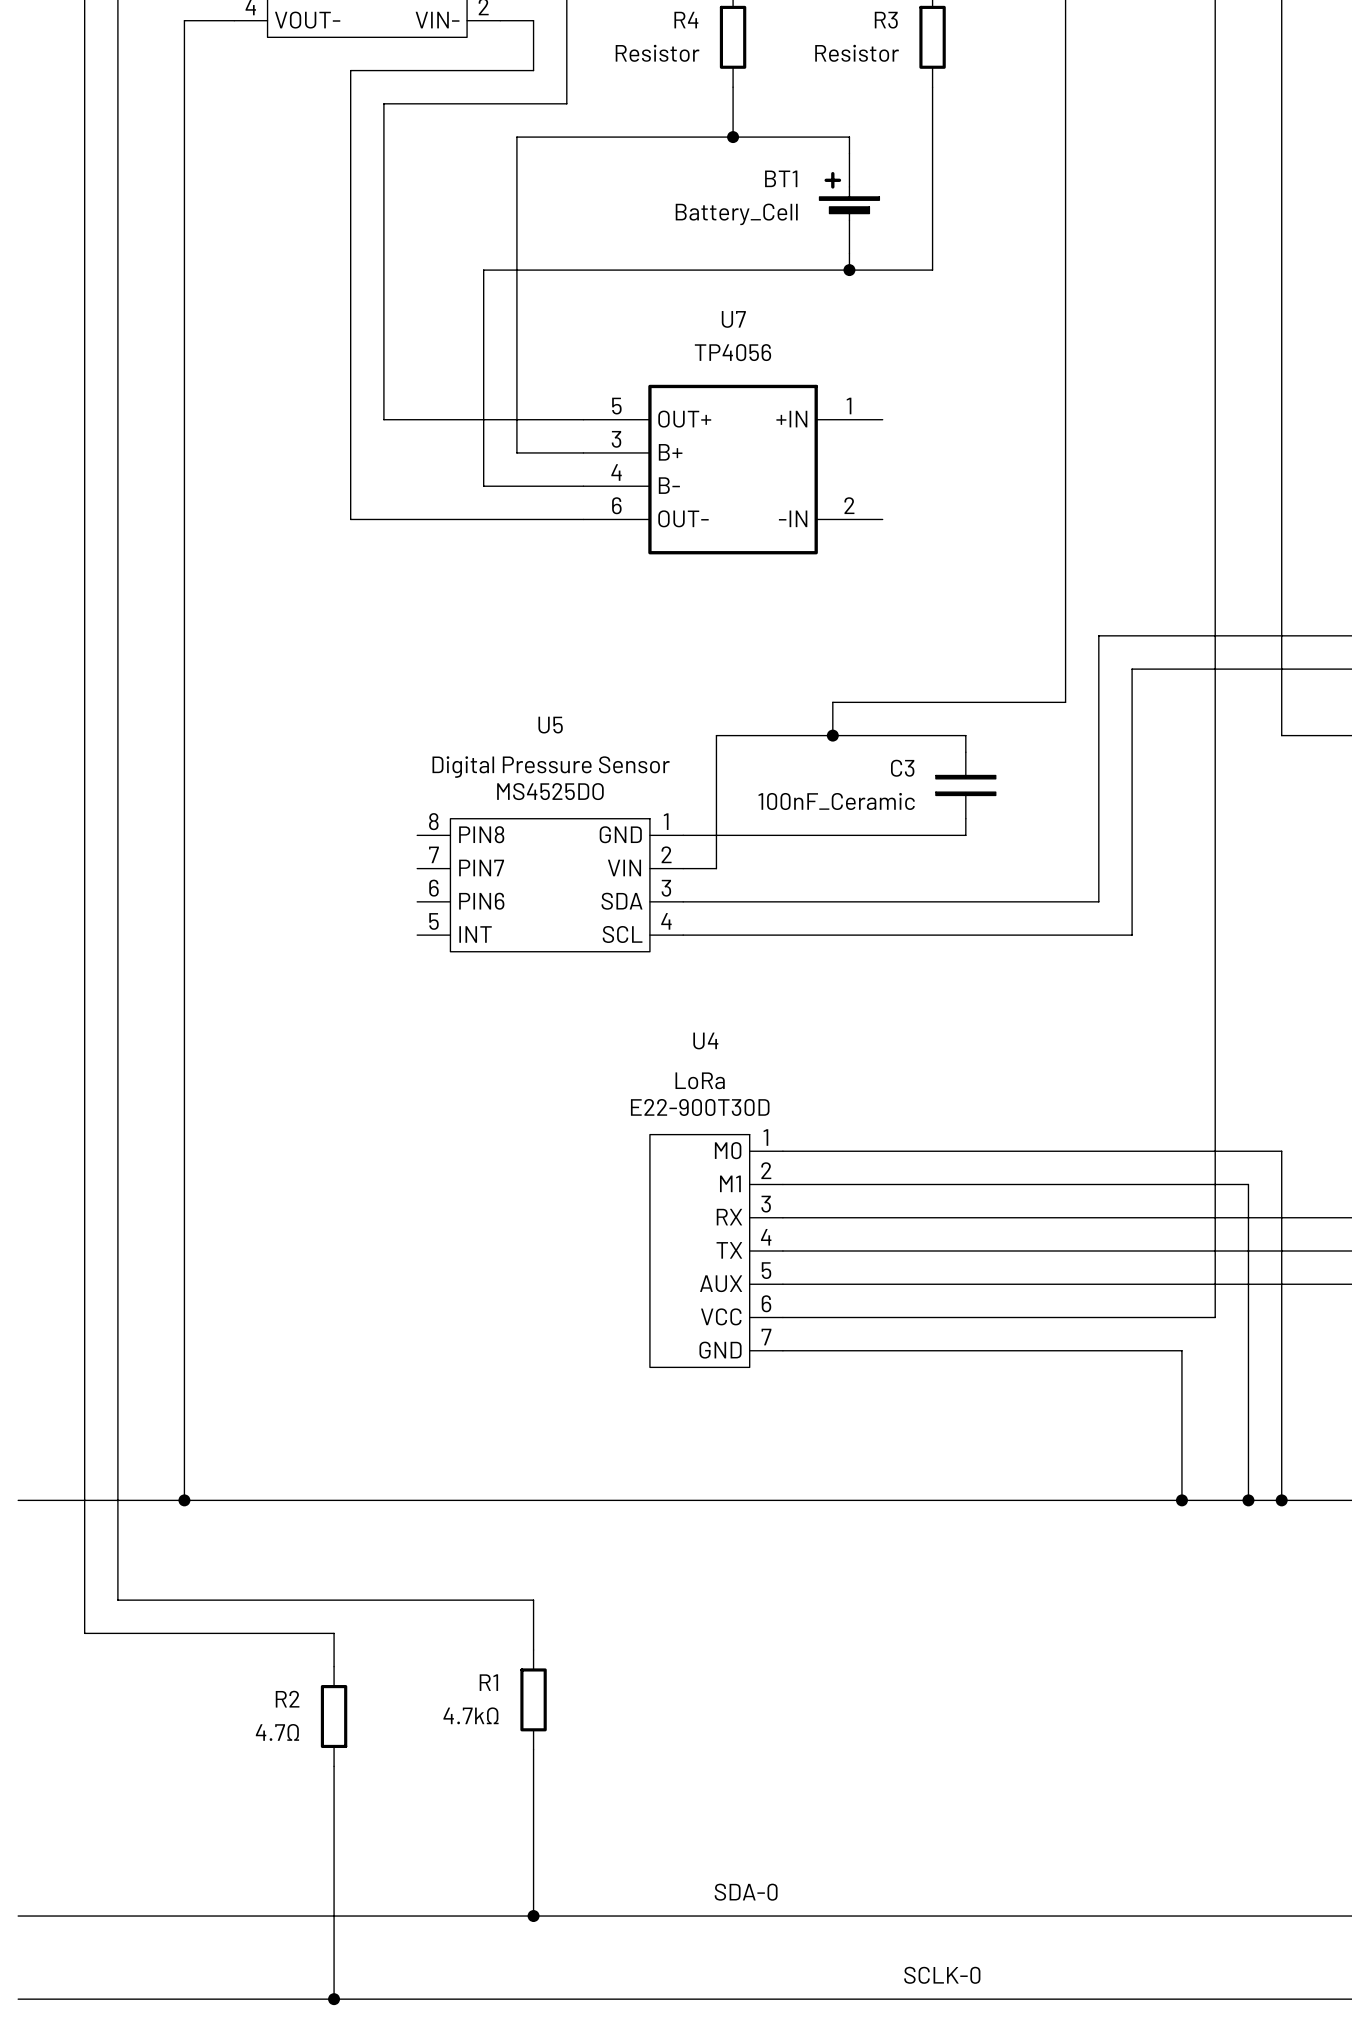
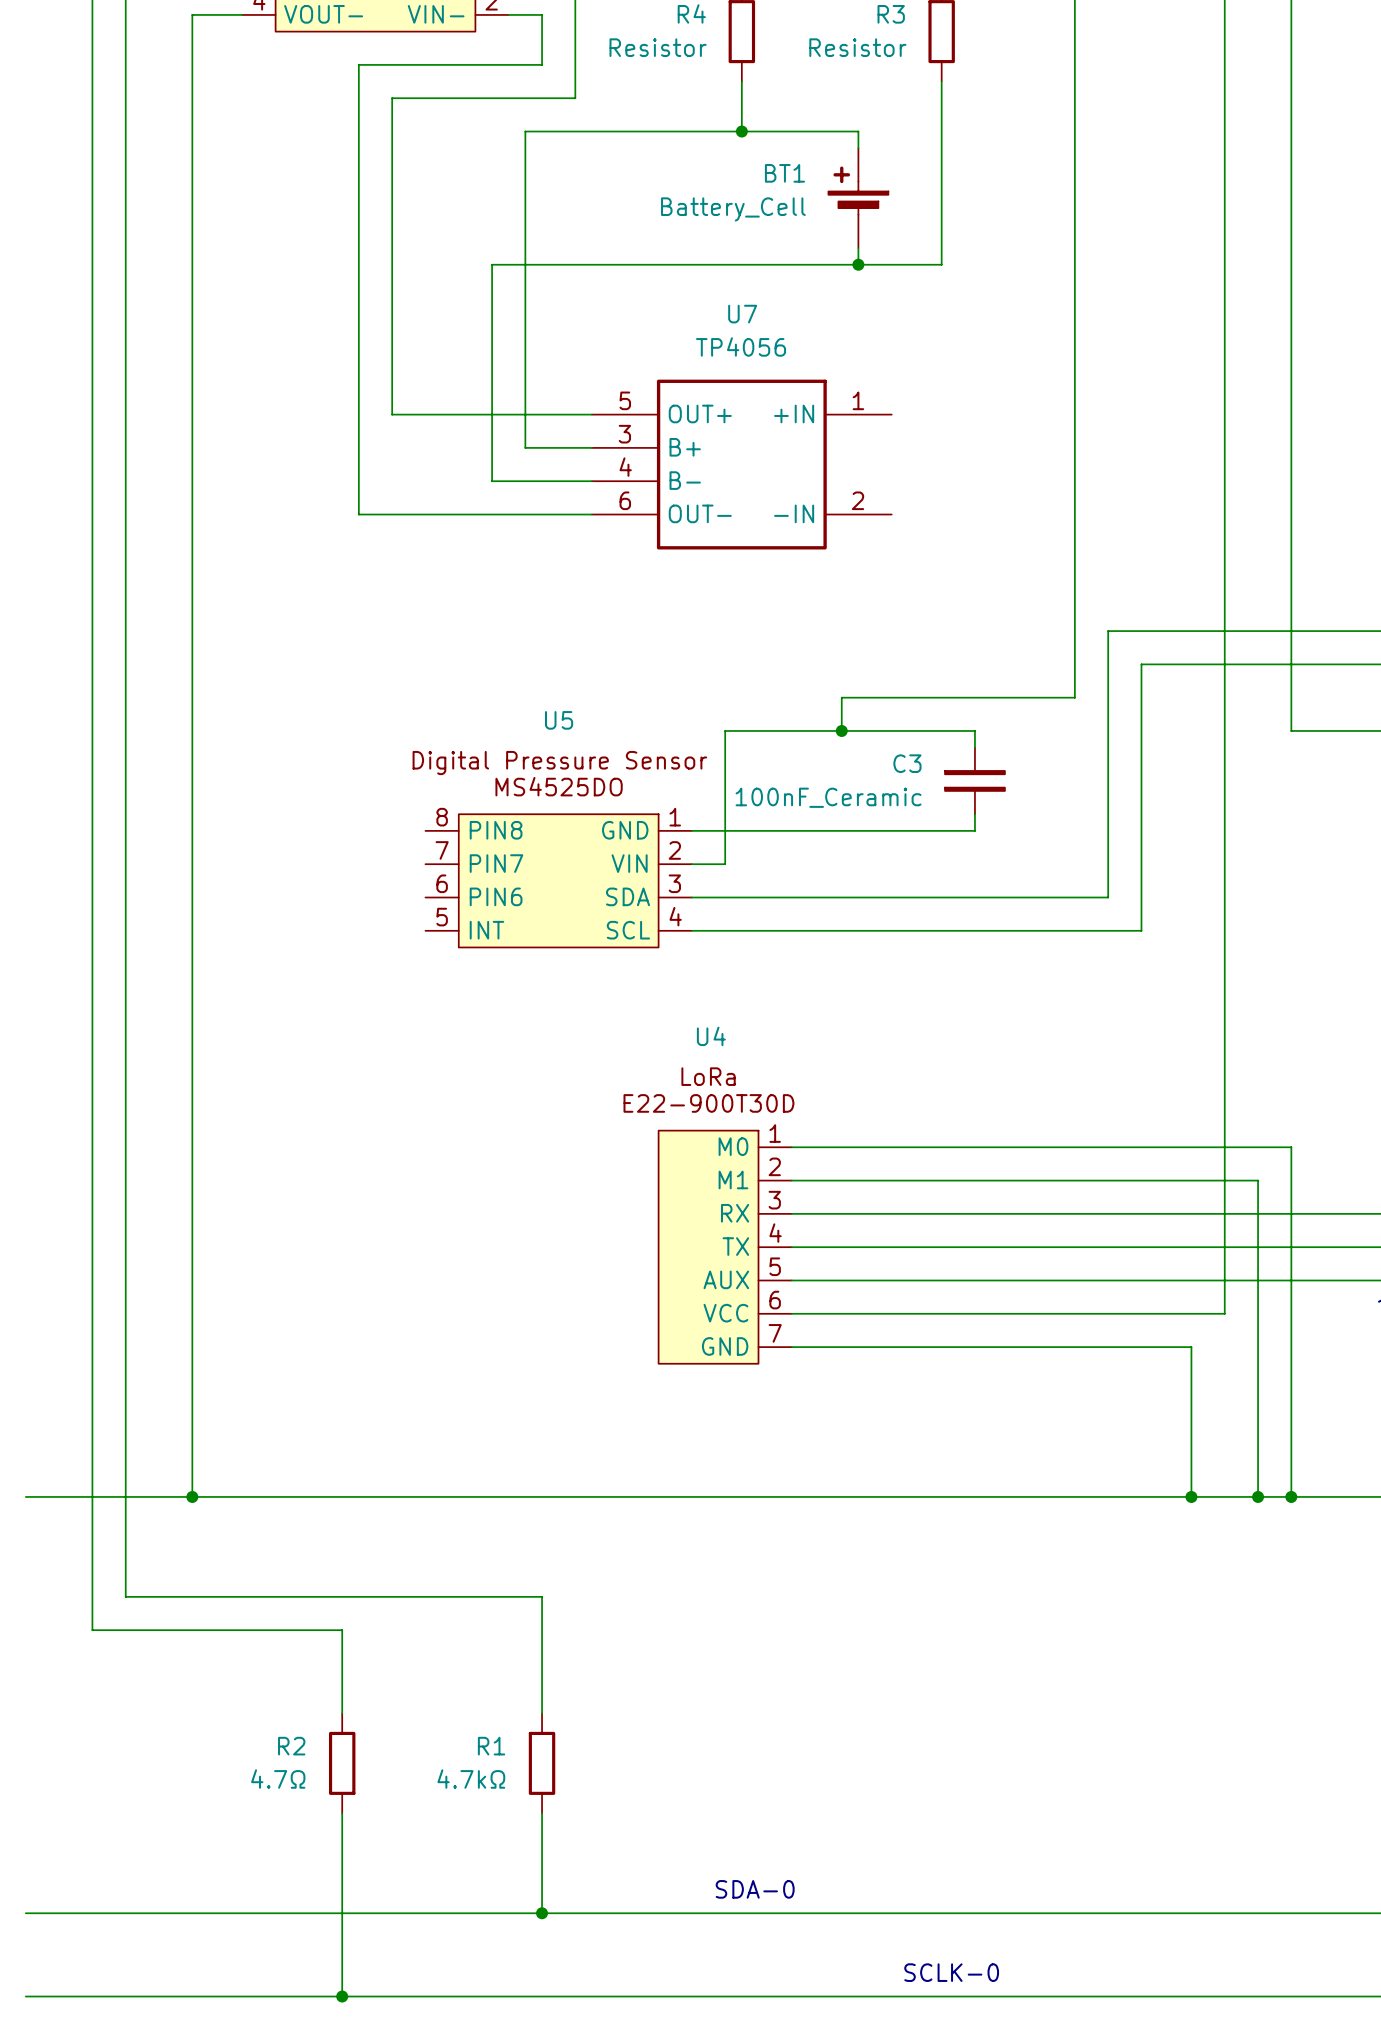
R1 position: (533, 1699) -> (542, 1763)
R2 position: (334, 1716) -> (342, 1763)
wire: (533, 1749) (533, 1816) -> (542, 1646) (542, 1713)
wire: (334, 1766) (334, 1816) -> (342, 1663) (342, 1713)

